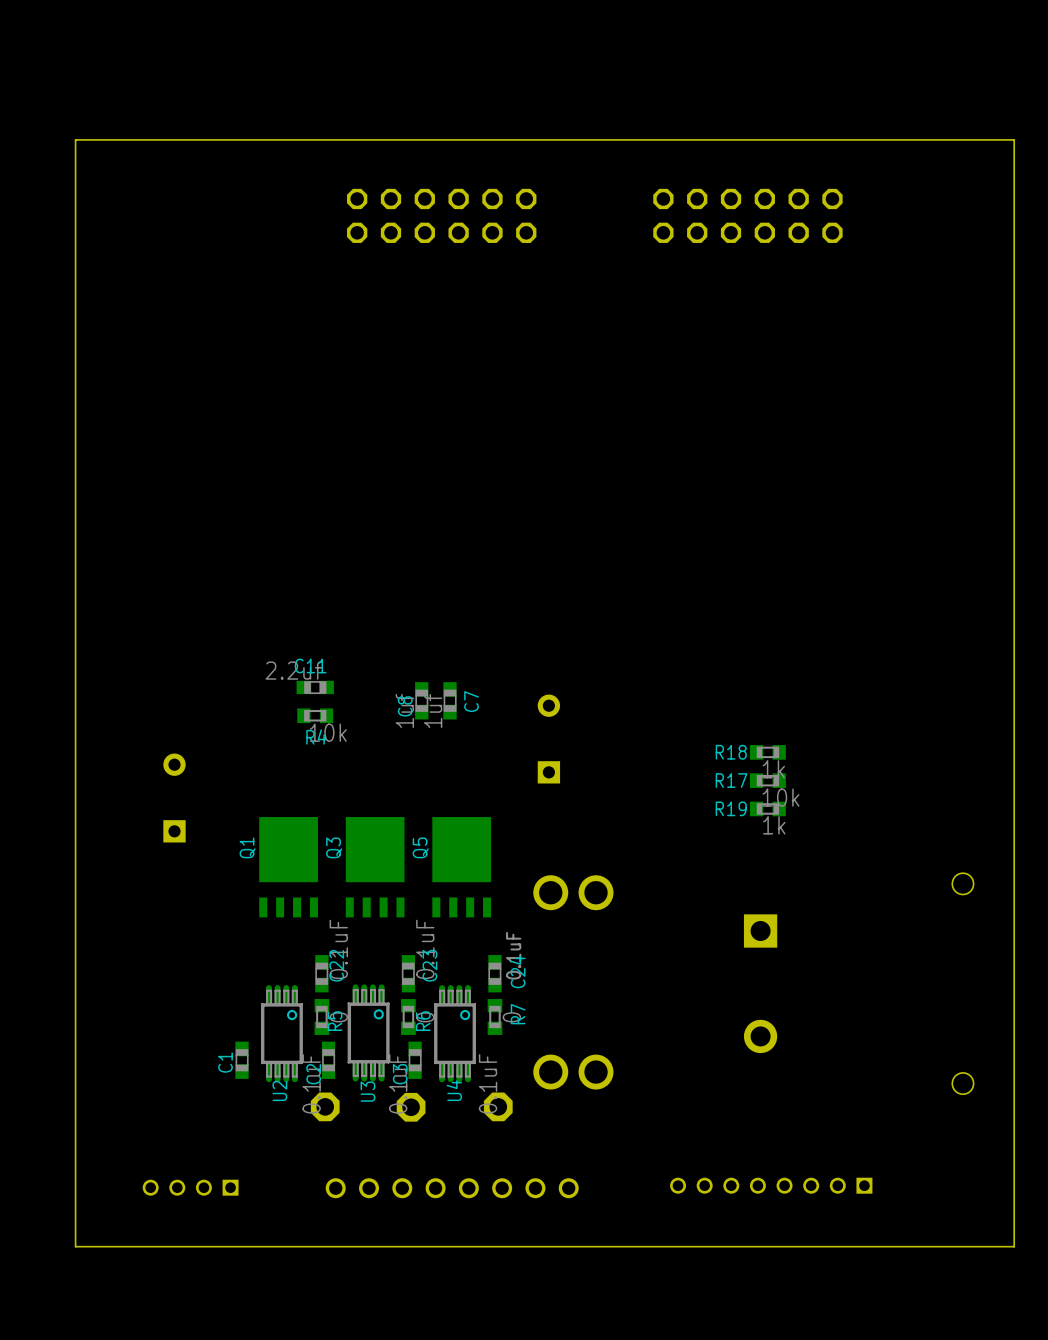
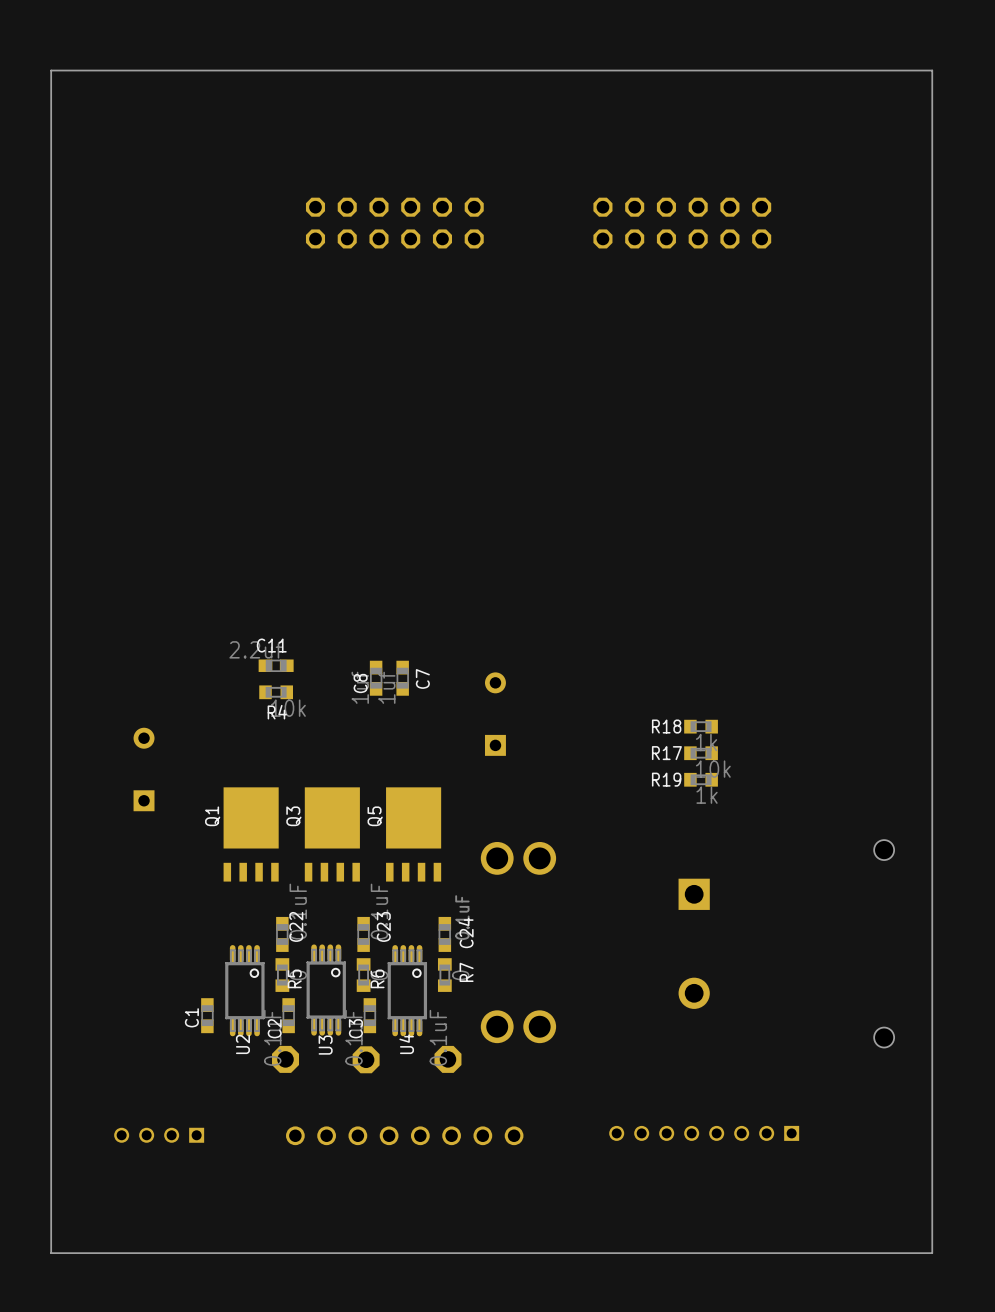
board edge: (1014, 139) (75, 139) -> (932, 151) (932, 70) (51, 70) (51, 151)
board edge: (1014, 1246) (75, 1246) -> (932, 1190) (932, 1253) (51, 1253) (51, 1190)

